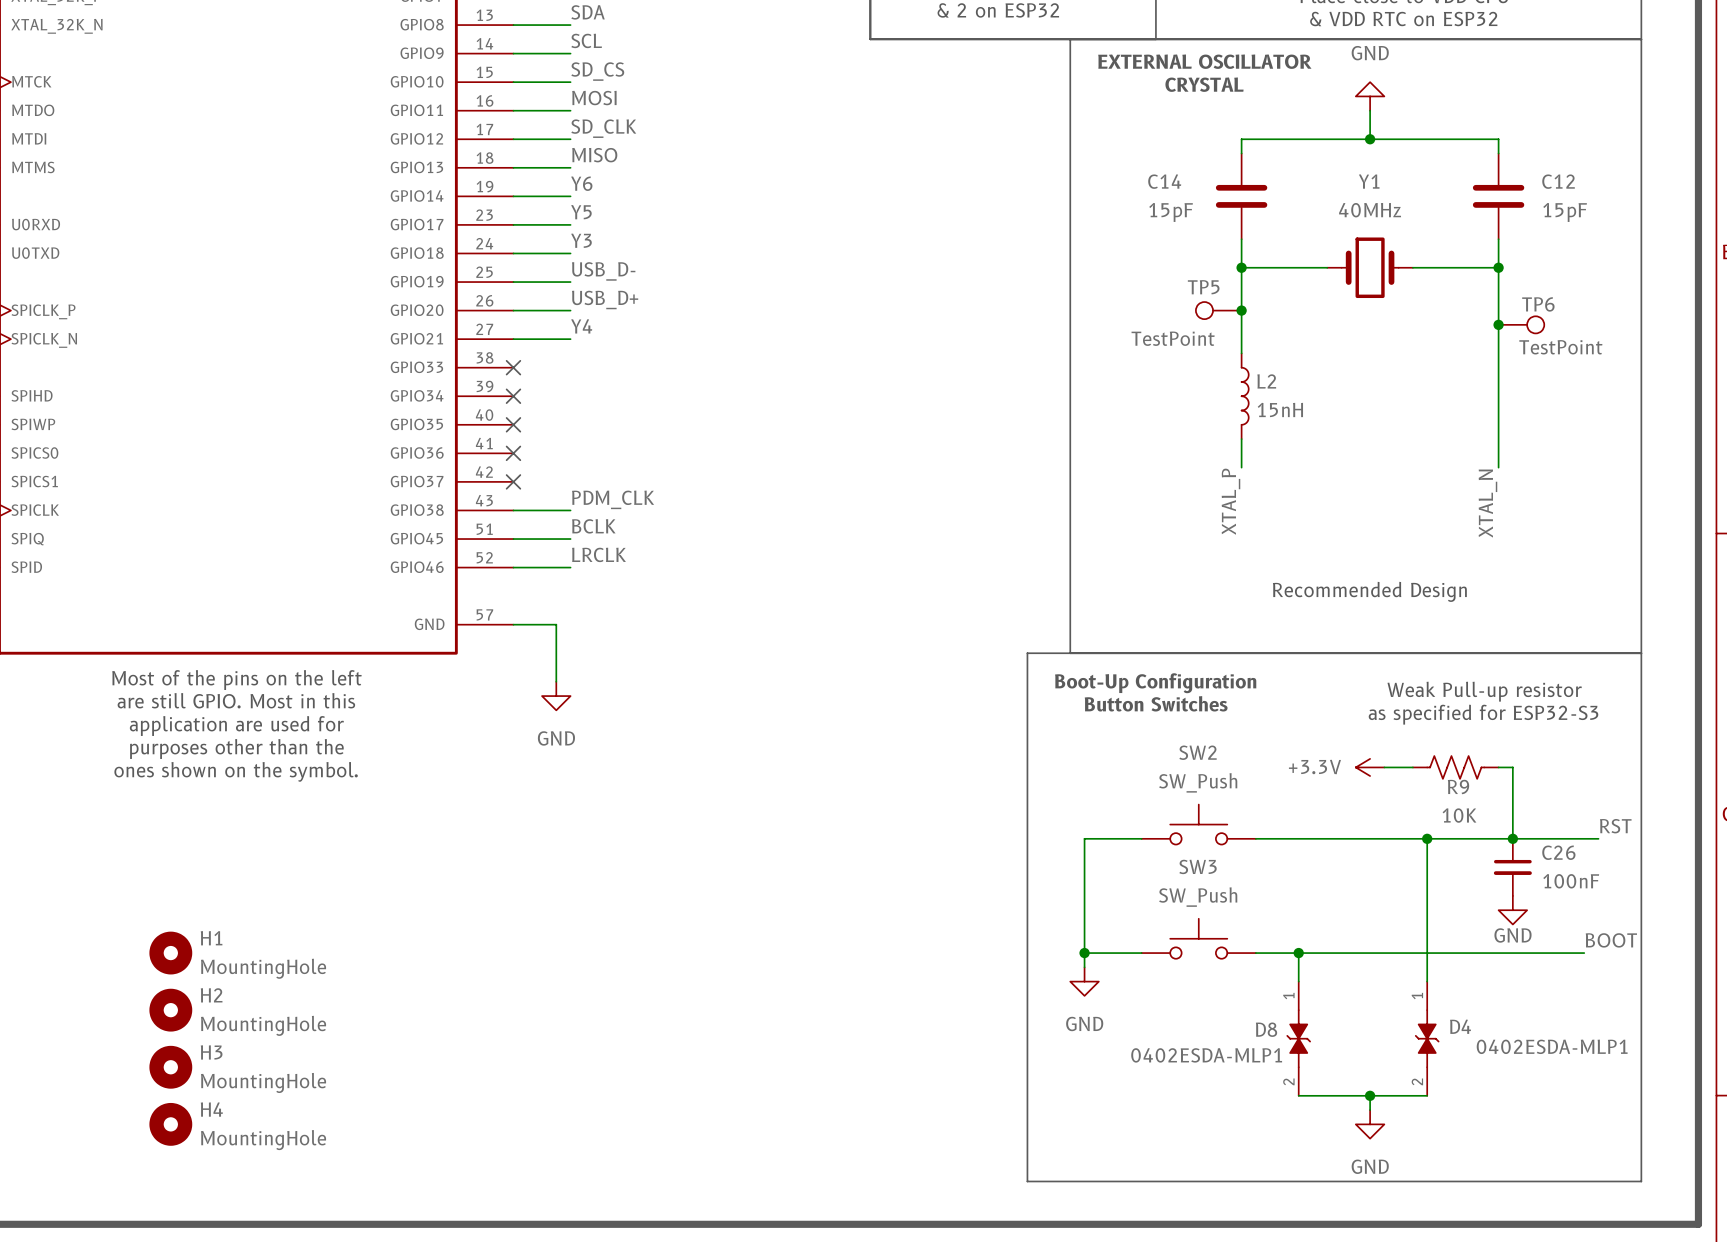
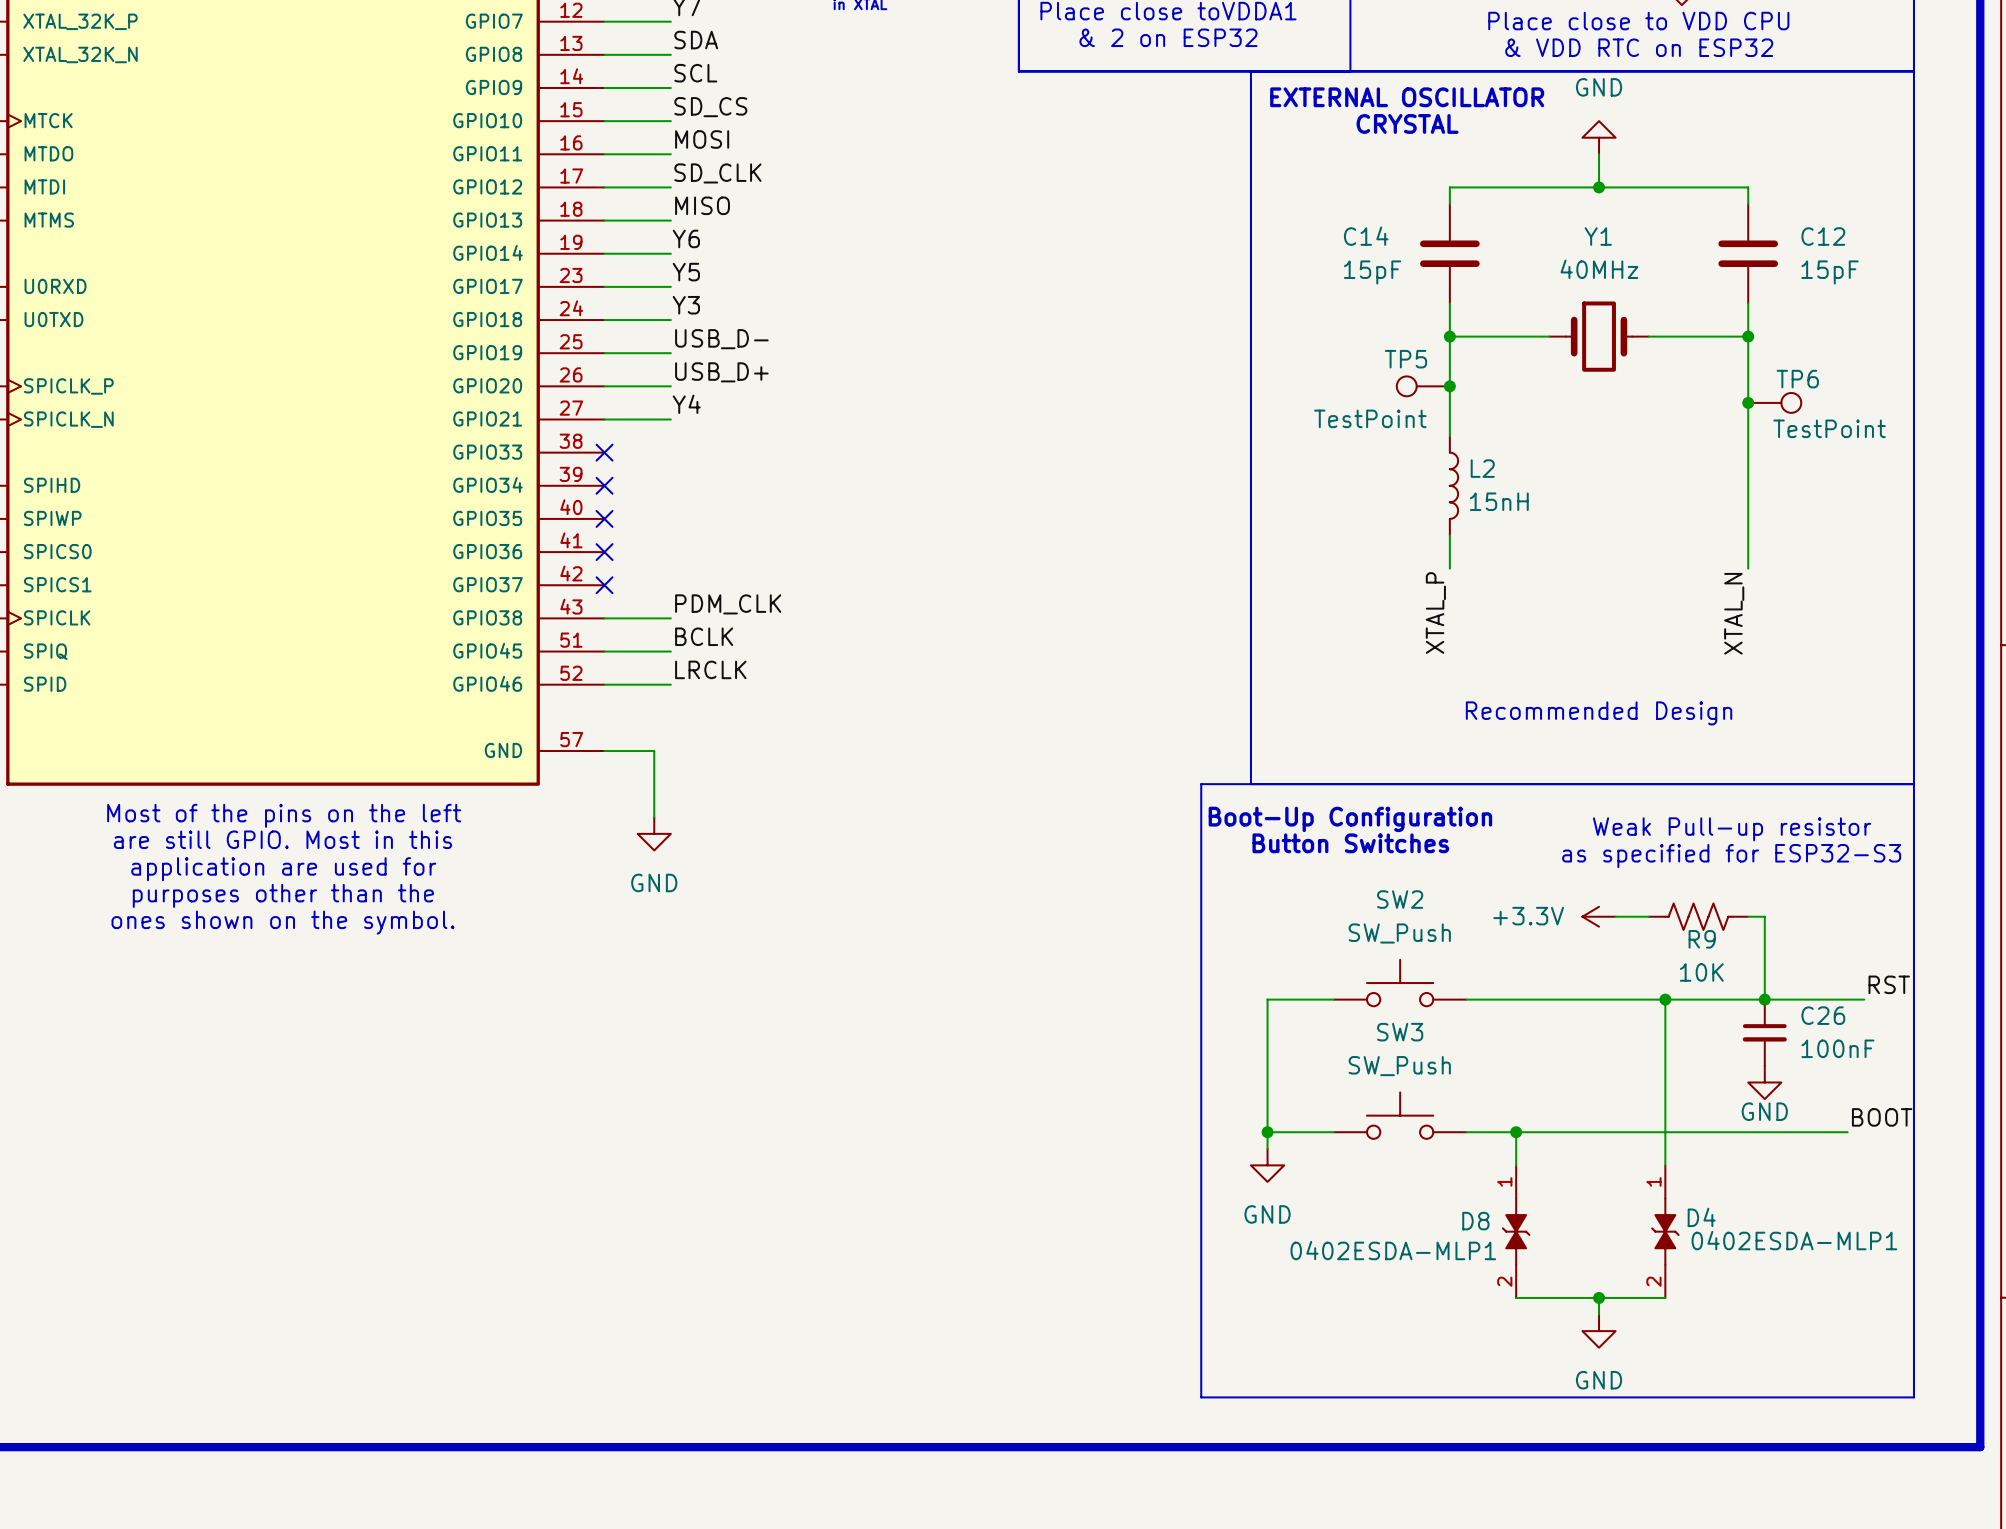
H1: MountingHole (170, 953) -> none
H2: MountingHole (170, 1010) -> none
H3: MountingHole (170, 1067) -> none
H4: MountingHole (170, 1124) -> none

